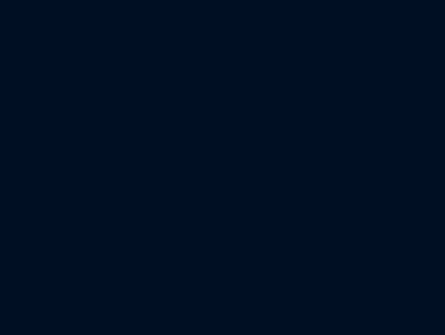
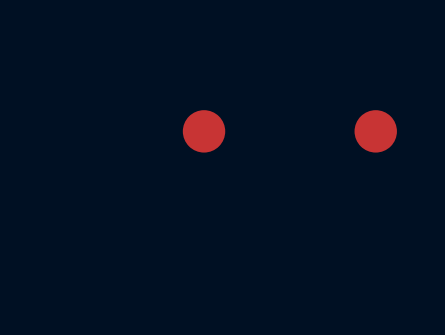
part: none -> (204, 131)
part: none -> (375, 131)

